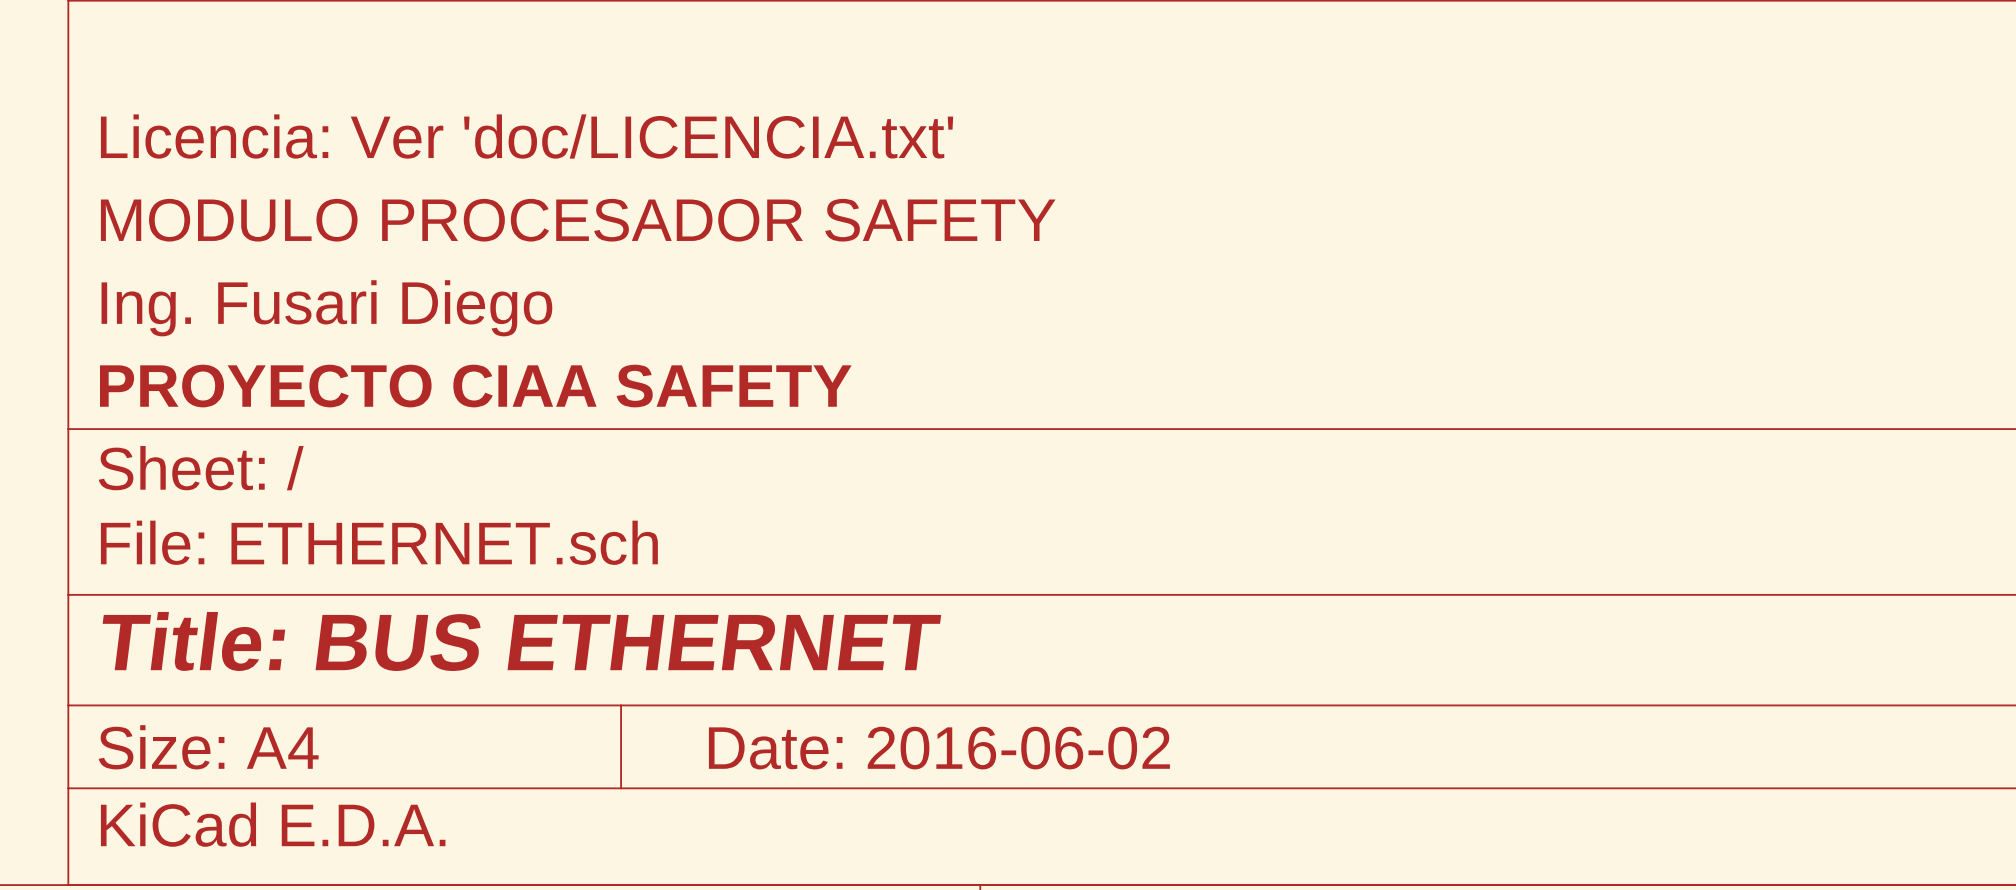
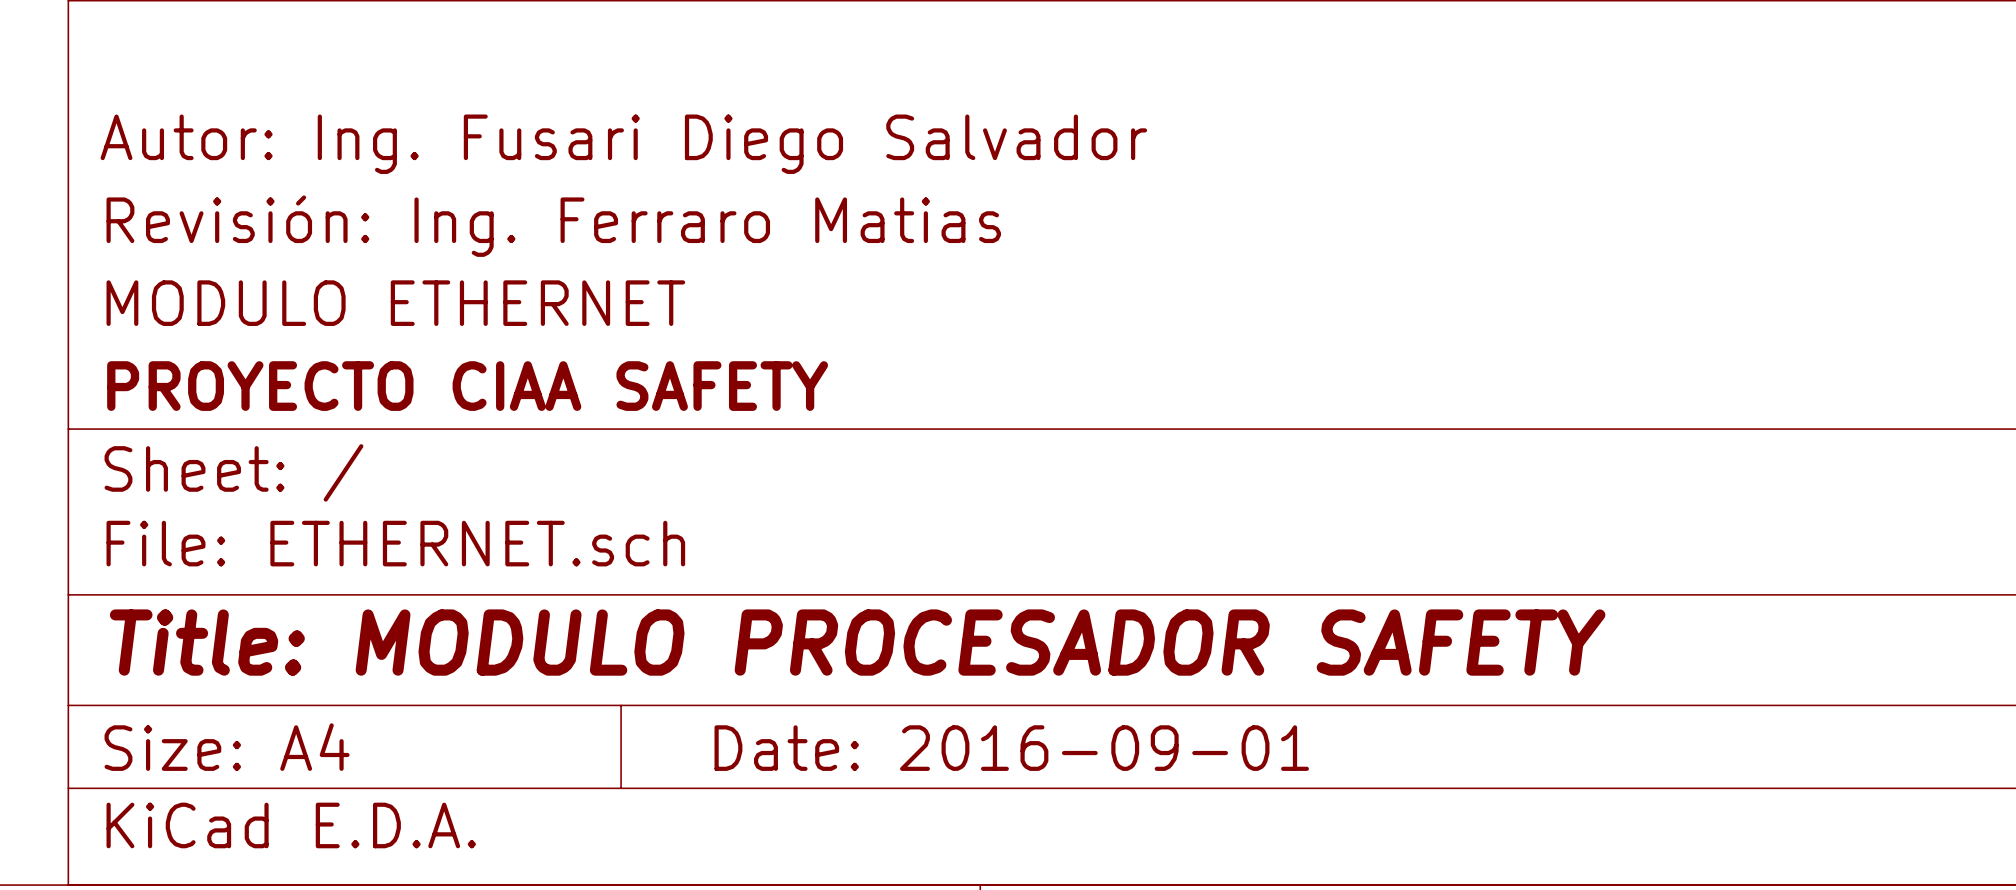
title block: Licencia: Ver 'doc/LICENCIA.txt' (527, 136) -> Autor: Ing. Fusari Diego Salvador (623, 144)
title block: MODULO PROCESADOR SAFETY (578, 220) -> Revisión: Ing. Ferraro Matias (553, 226)
title block: Ing. Fusari Diego (326, 308) -> MODULO ETHERNET (395, 303)
title block: Title: BUS ETHERNET (521, 641) -> Title: MODULO PROCESADOR SAFETY (857, 642)
title block: Date: 2016-06-02 (939, 748) -> Date: 2016-09-01 (1011, 748)

